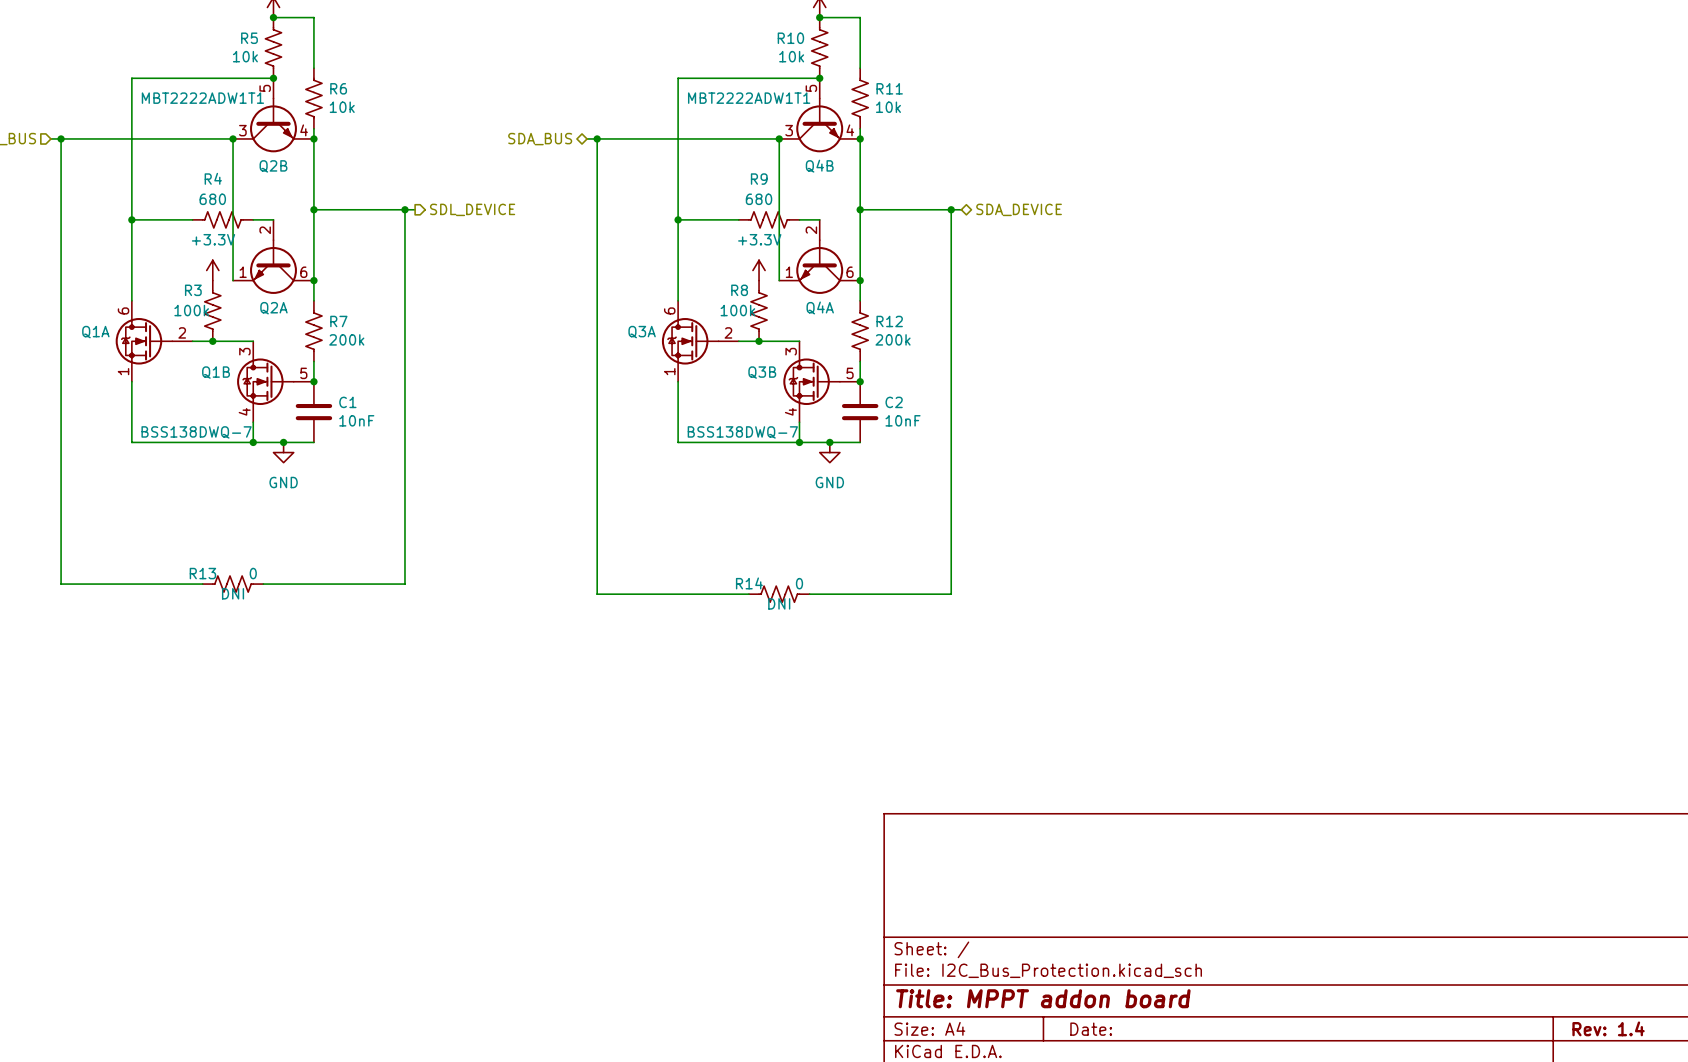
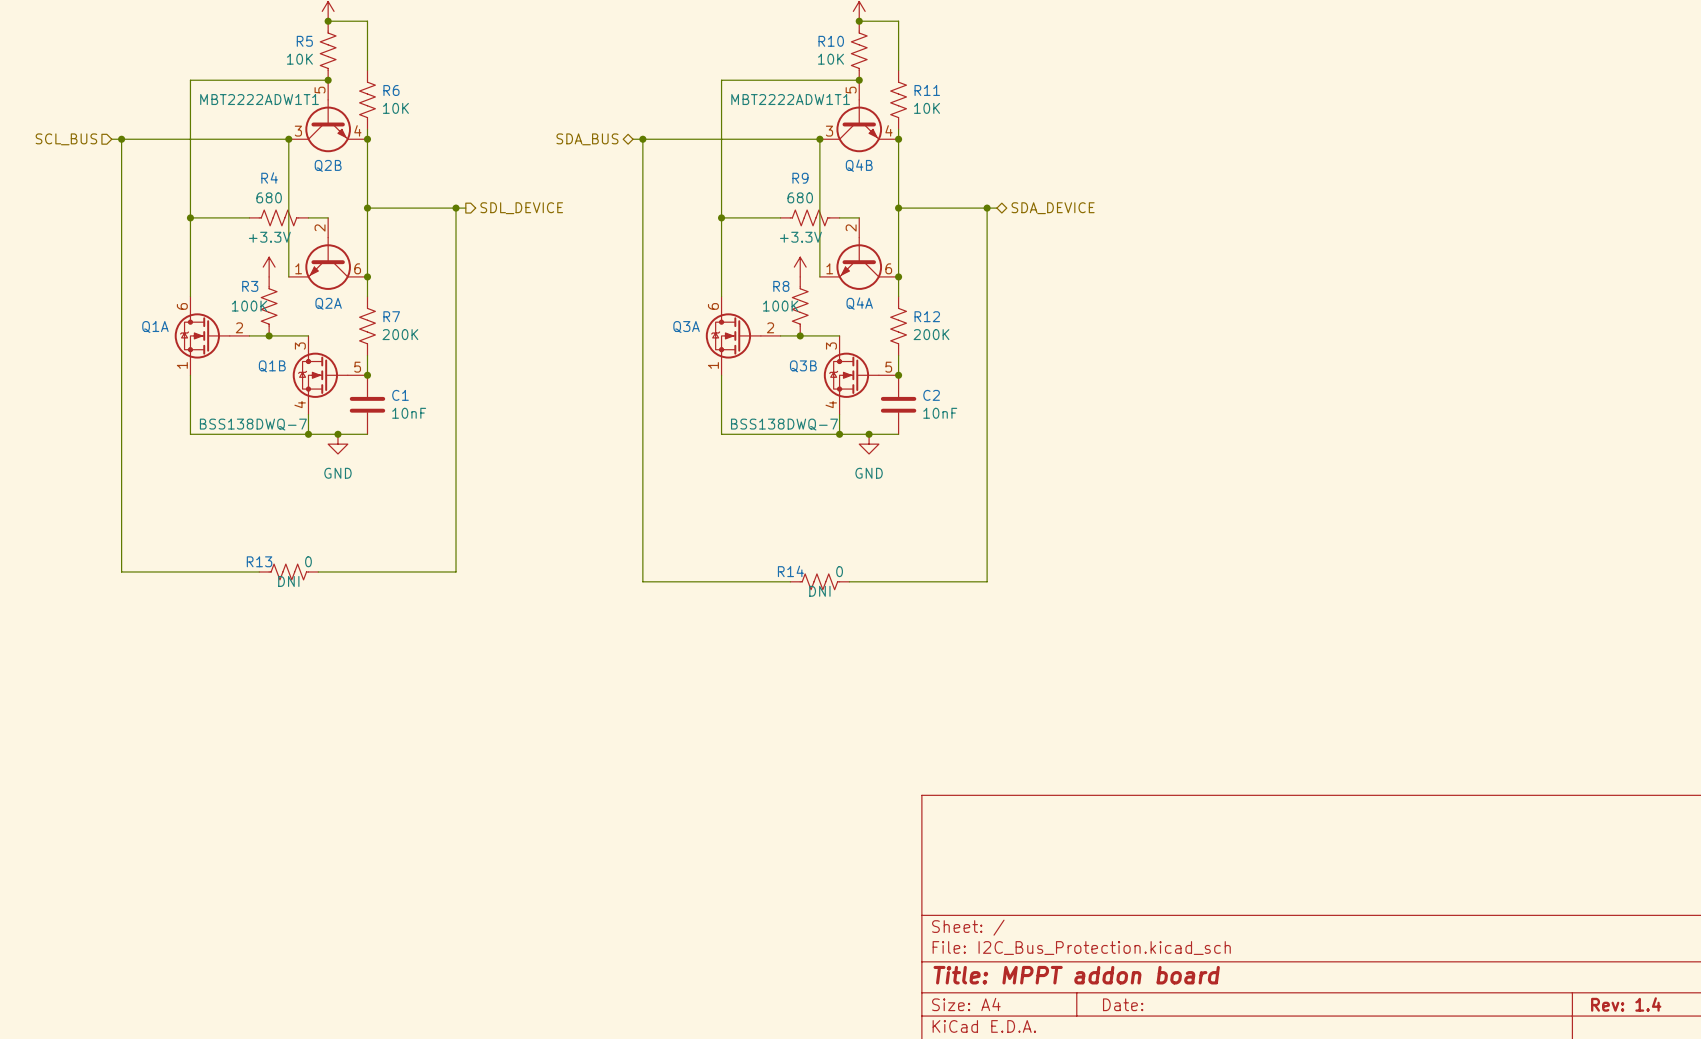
R5 value: 10k (245, 56) -> 10K (299, 59)
R10 value: 10k (791, 56) -> 10K (831, 59)
R6 value: 10k (342, 107) -> 10K (395, 108)
R11 value: 10k (888, 107) -> 10K (927, 108)
R3 value: 100k (191, 310) -> 100K (249, 306)
R8 value: 100k (737, 310) -> 100K (780, 306)
R7 value: 200k (346, 339) -> 200K (400, 334)
R12 value: 200k (893, 339) -> 200K (931, 334)

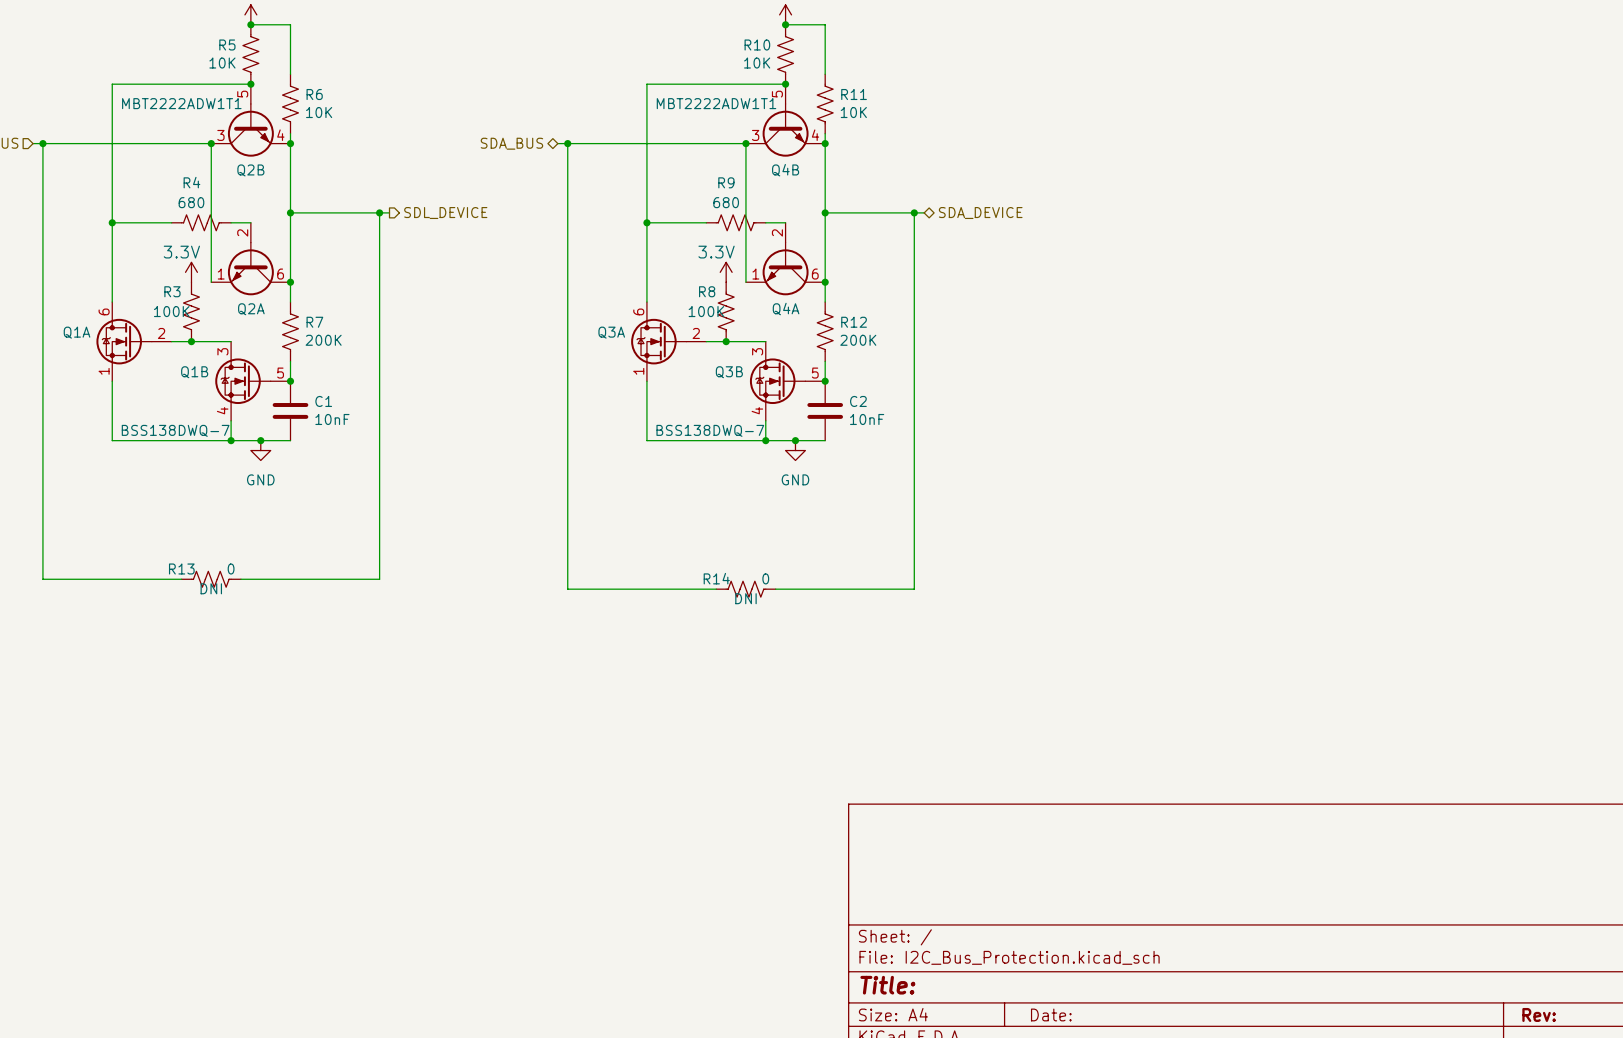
power symbol: +3.3V (269, 267) -> 3.3V (191, 272)
power symbol: +3.3V (800, 267) -> 3.3V (726, 272)
title block: Title: MPPT addon board (1076, 975) -> Title: (887, 985)
title block: Rev: 1.4 (1626, 1004) -> Rev: (1539, 1014)

